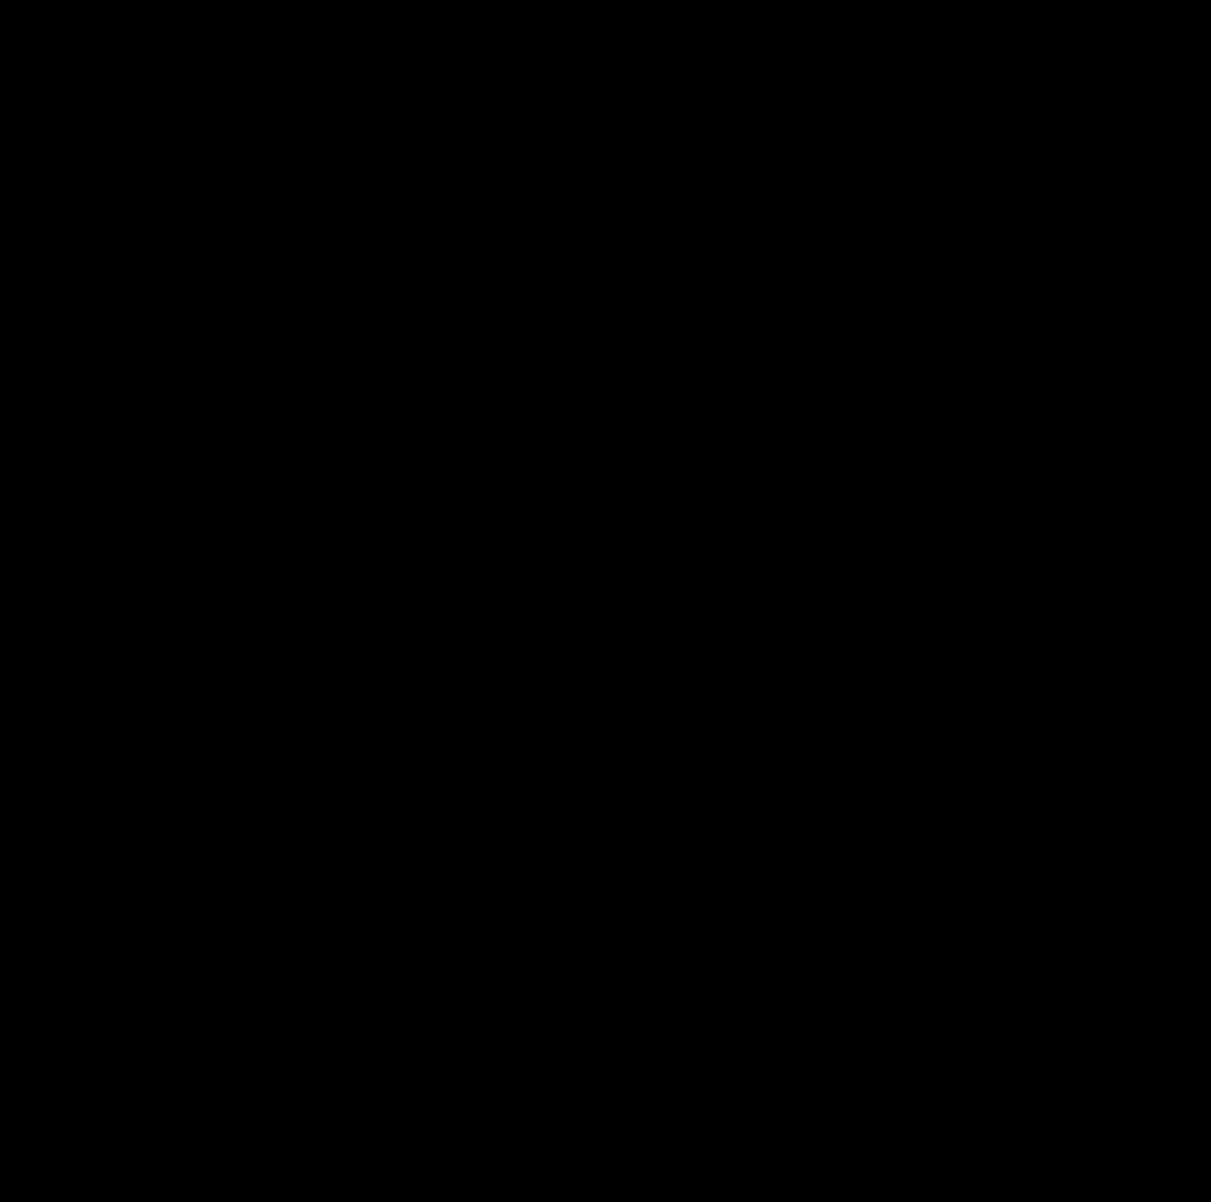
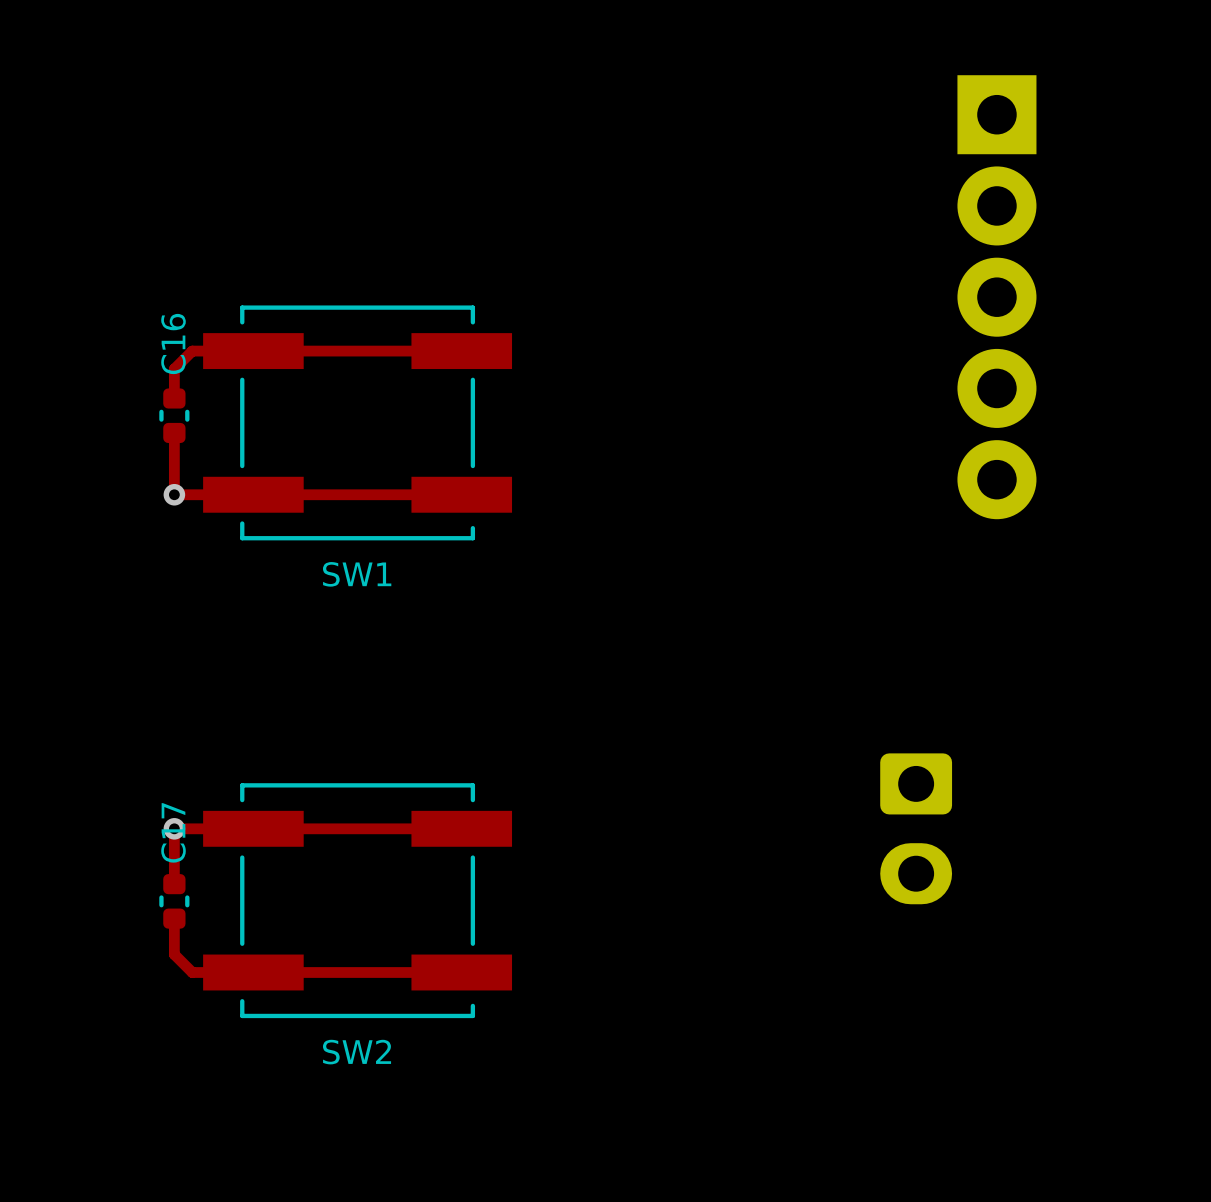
part: none -> (996, 297)
track: none -> (461, 351) (192, 351) (174, 369) (174, 398)
C16: none -> (174, 415)
SW1: none -> (357, 422)
track: none -> (174, 432) (174, 494) (461, 494)
via: none -> (174, 494)
via: none -> (174, 828)
track: none -> (461, 828) (174, 828) (174, 884)
part: none -> (916, 828)
SW2: none -> (357, 900)
C17: none -> (174, 901)
track: none -> (174, 918) (174, 954) (192, 972) (461, 972)

